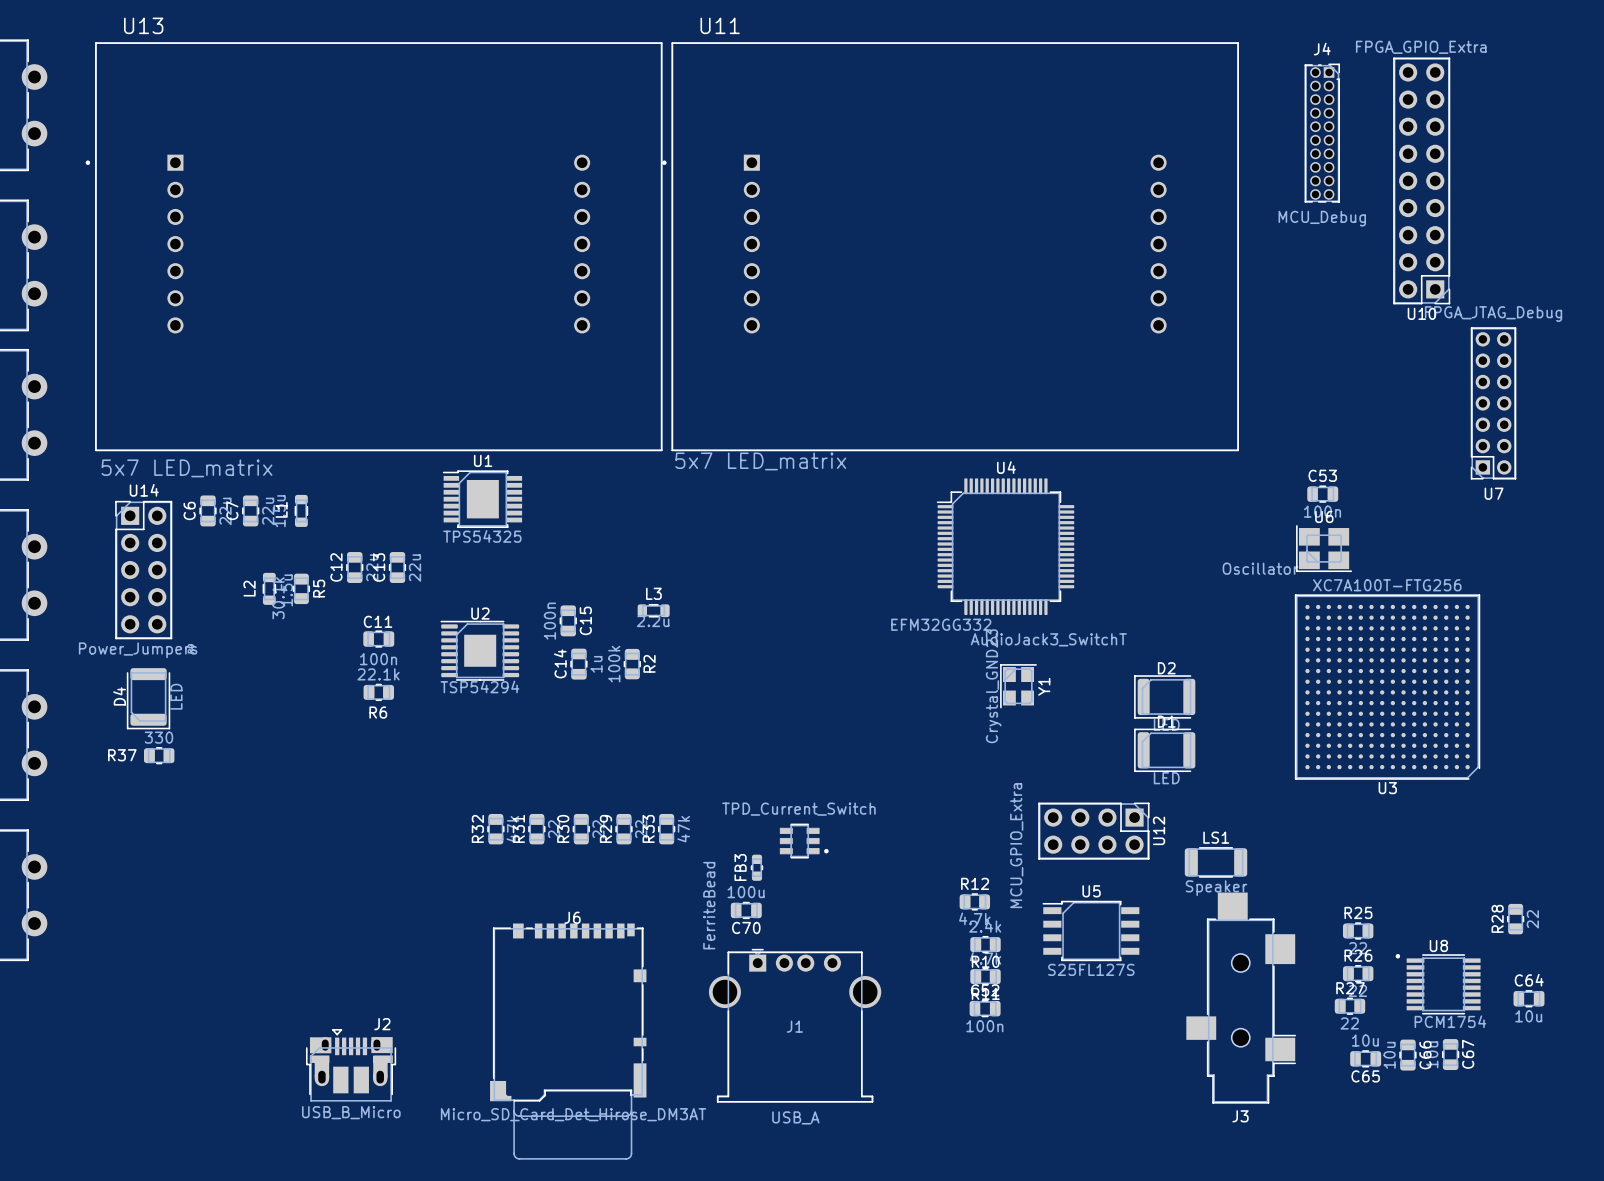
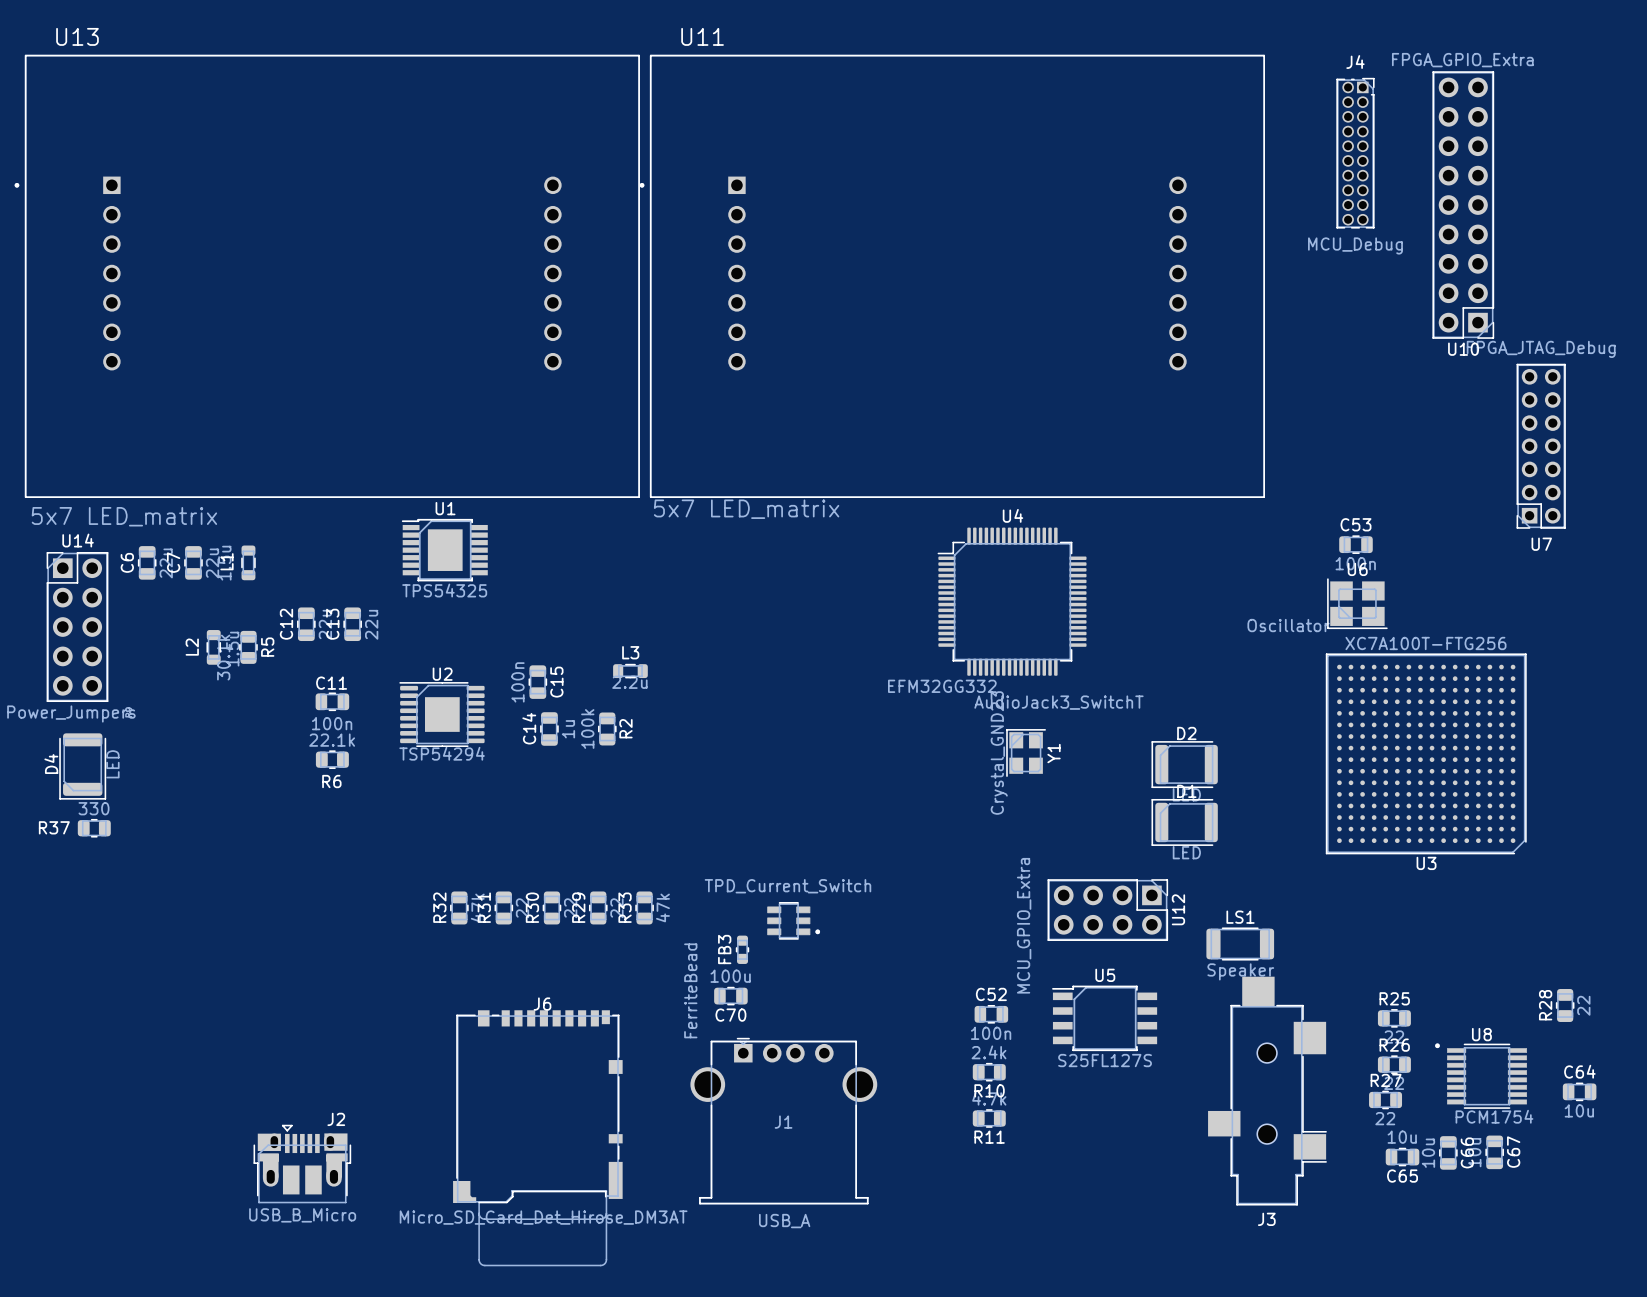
R12: 4.7k (974, 901) -> none
R10 position: (985, 944) -> (989, 1072)
R11 position: (985, 976) -> (989, 1118)
C52 position: (985, 1008) -> (991, 1014)

